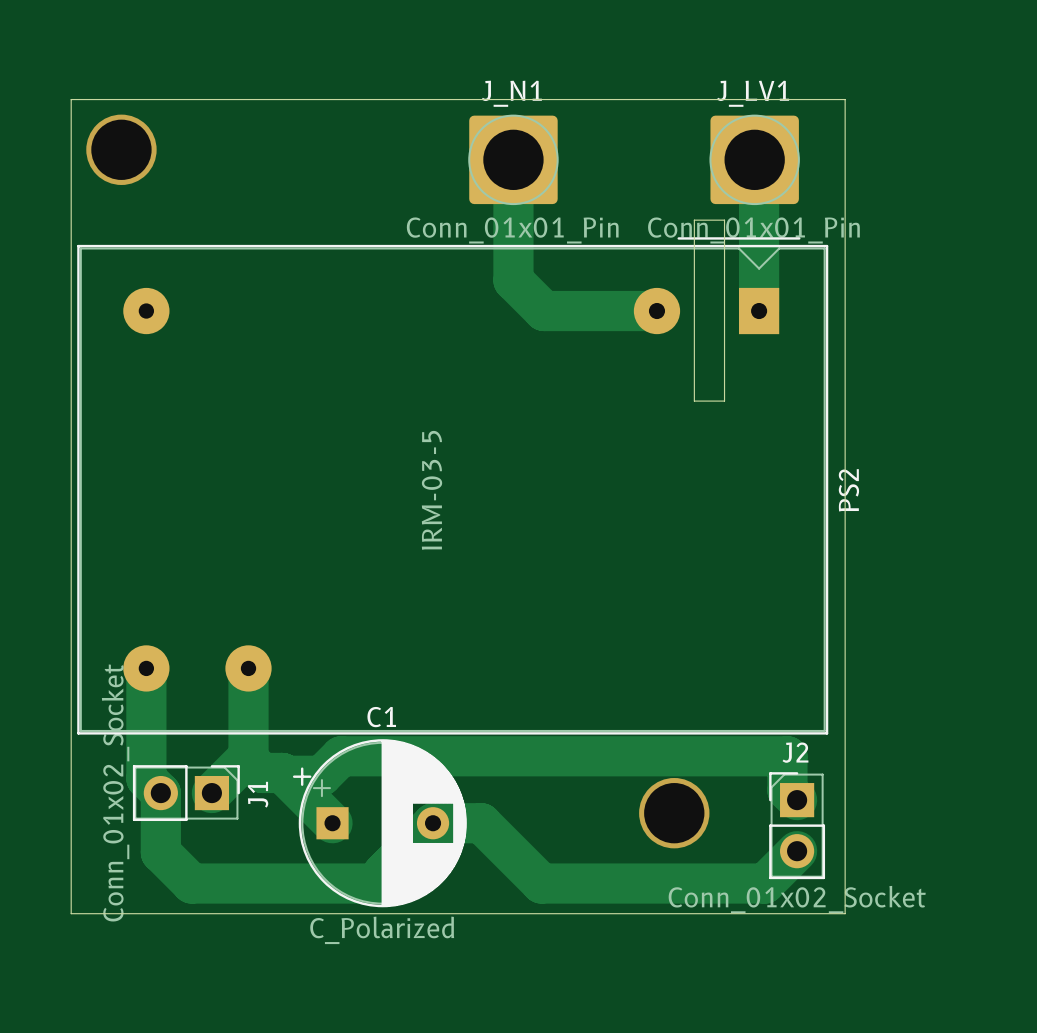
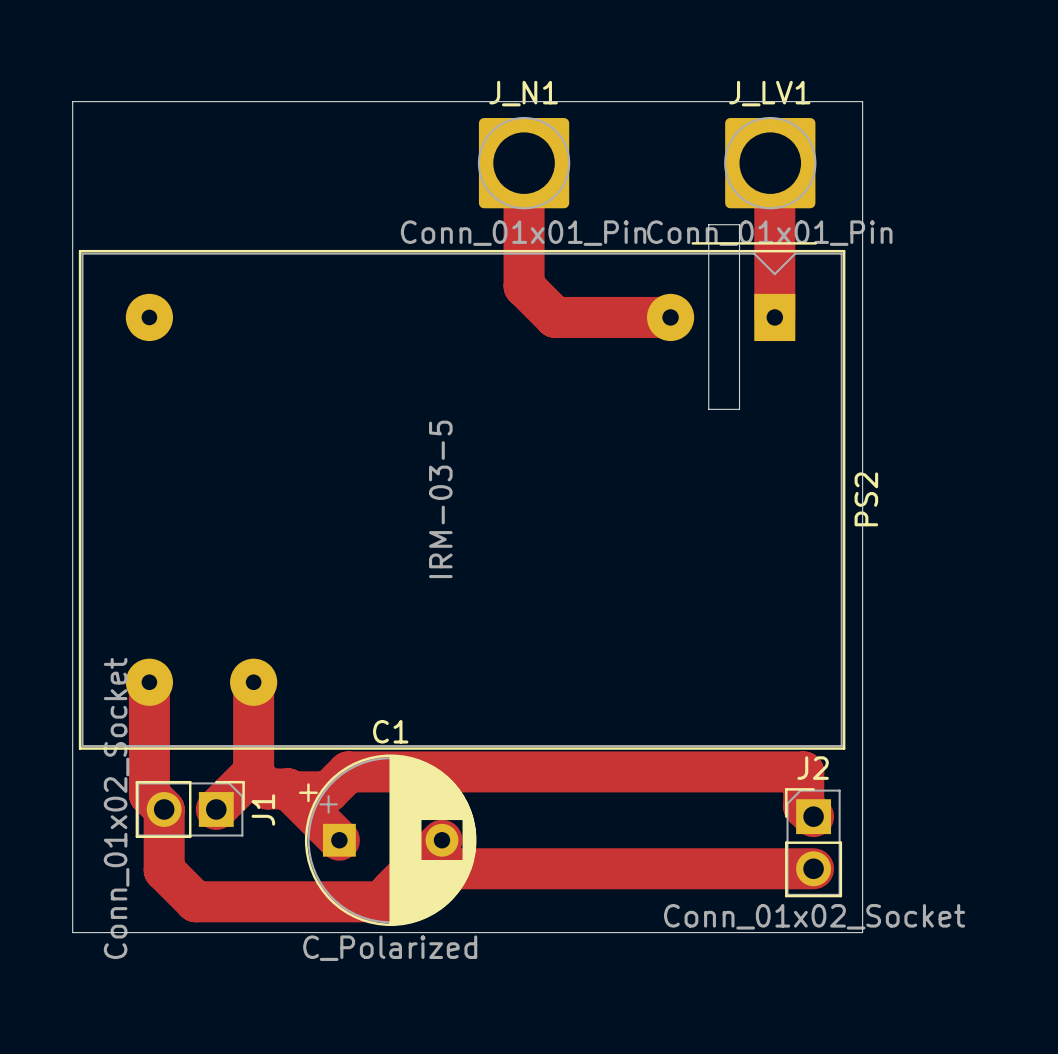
via: (121, 149) -> none
via: (674, 813) -> none
track: (433, 823) (481, 823) (541, 883) (764, 883) (797, 851) -> (413, 868) (813, 868)

